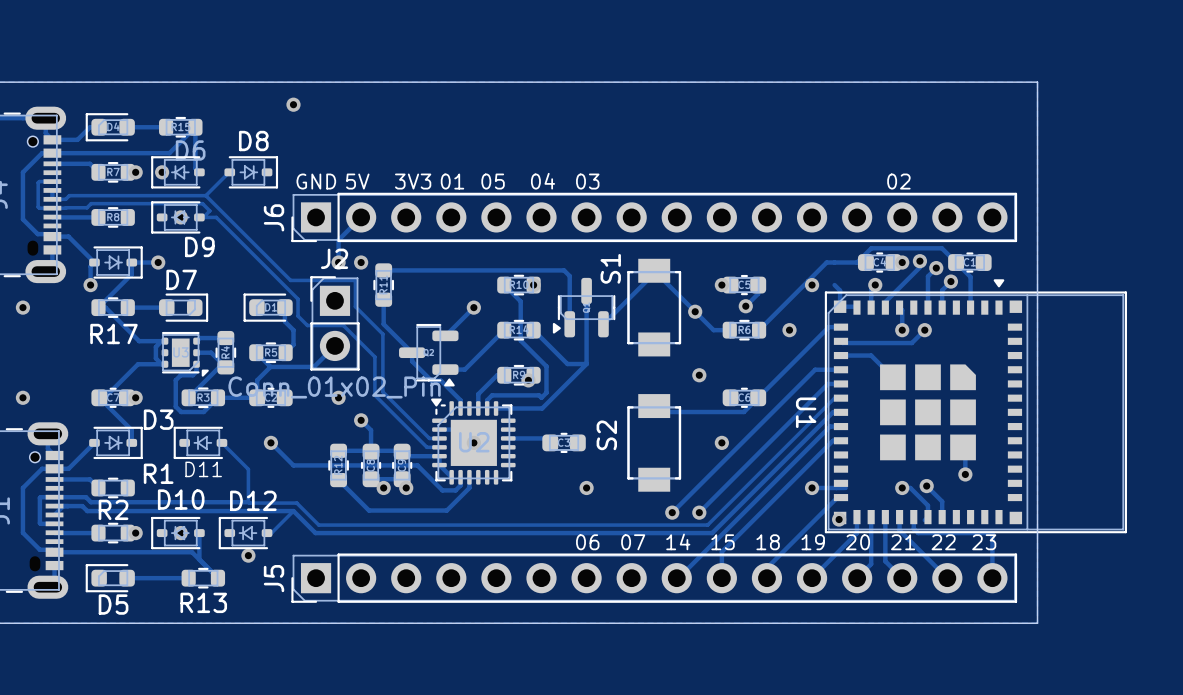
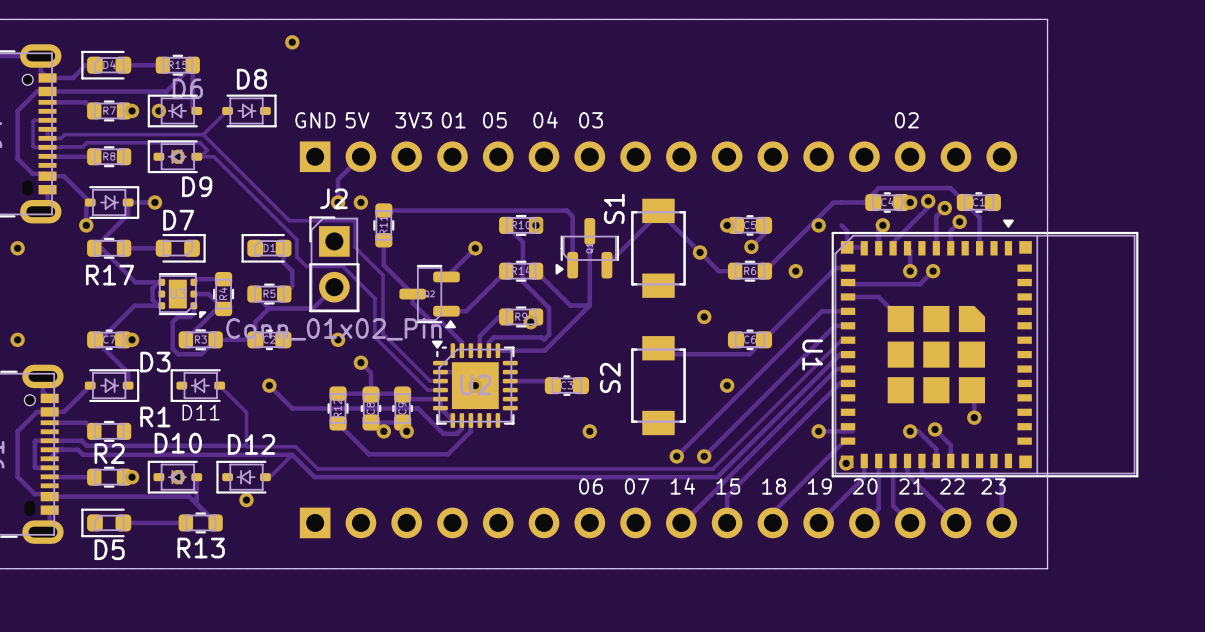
J6 side: top (654, 217) -> bottom (658, 156)
J5 side: top (654, 578) -> bottom (658, 522)

